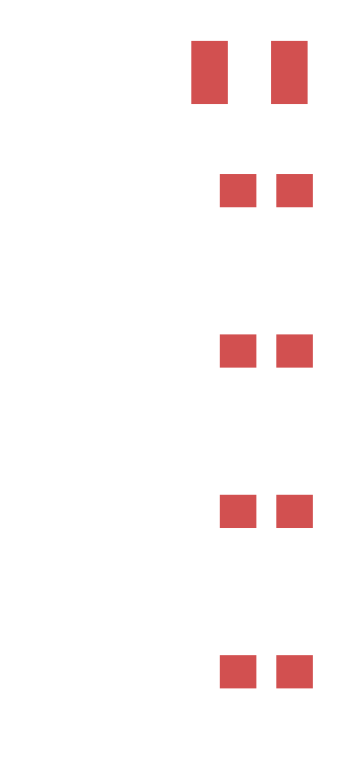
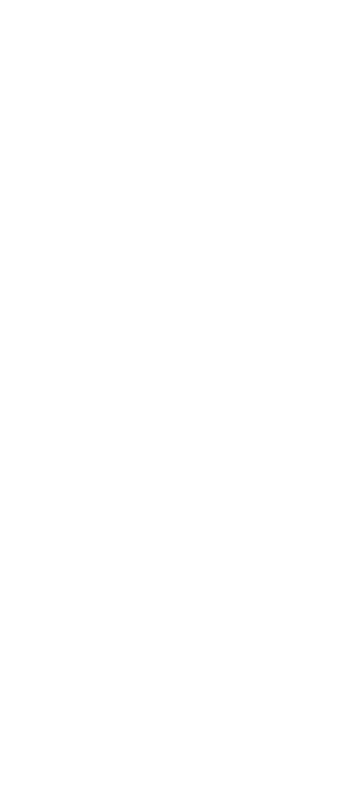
part: (249, 72) -> none
part: (266, 190) -> none
part: (266, 351) -> none
part: (266, 511) -> none
part: (266, 671) -> none

